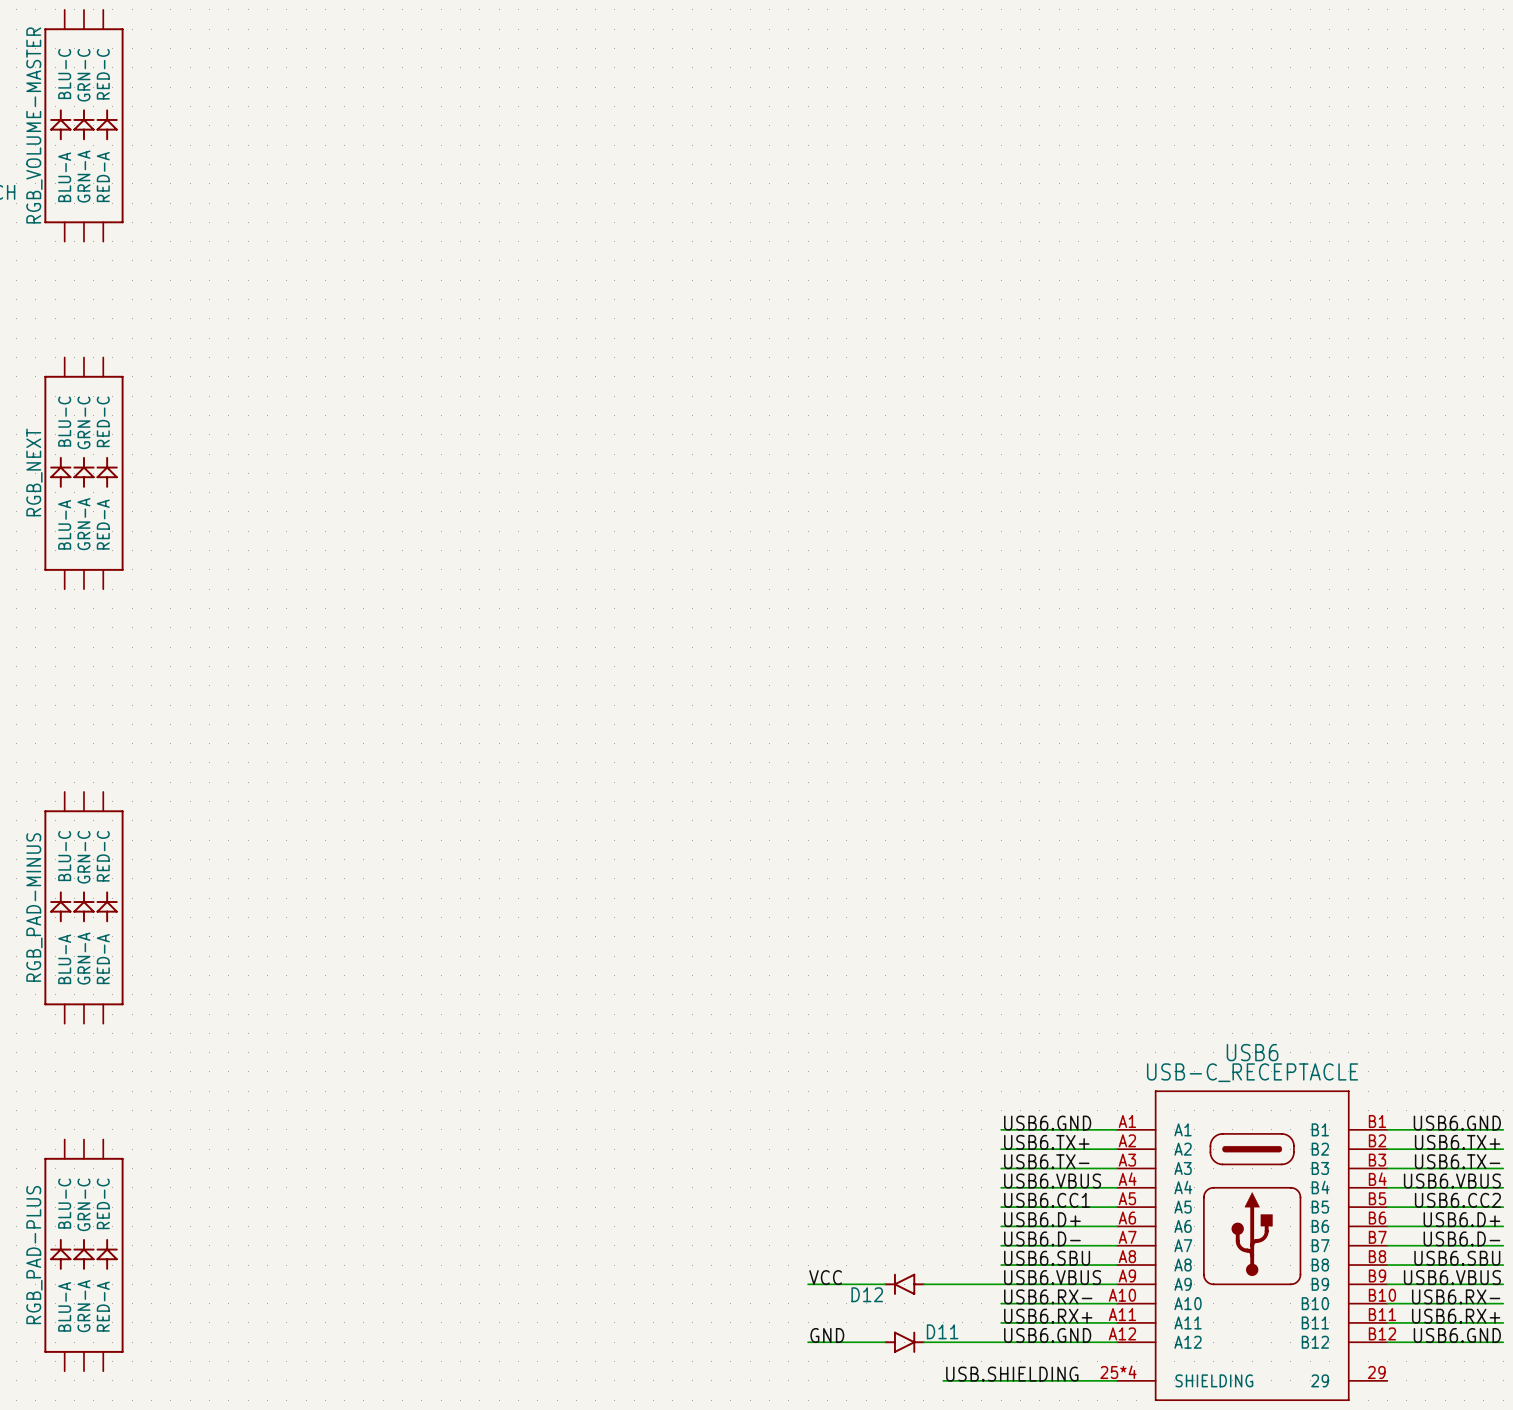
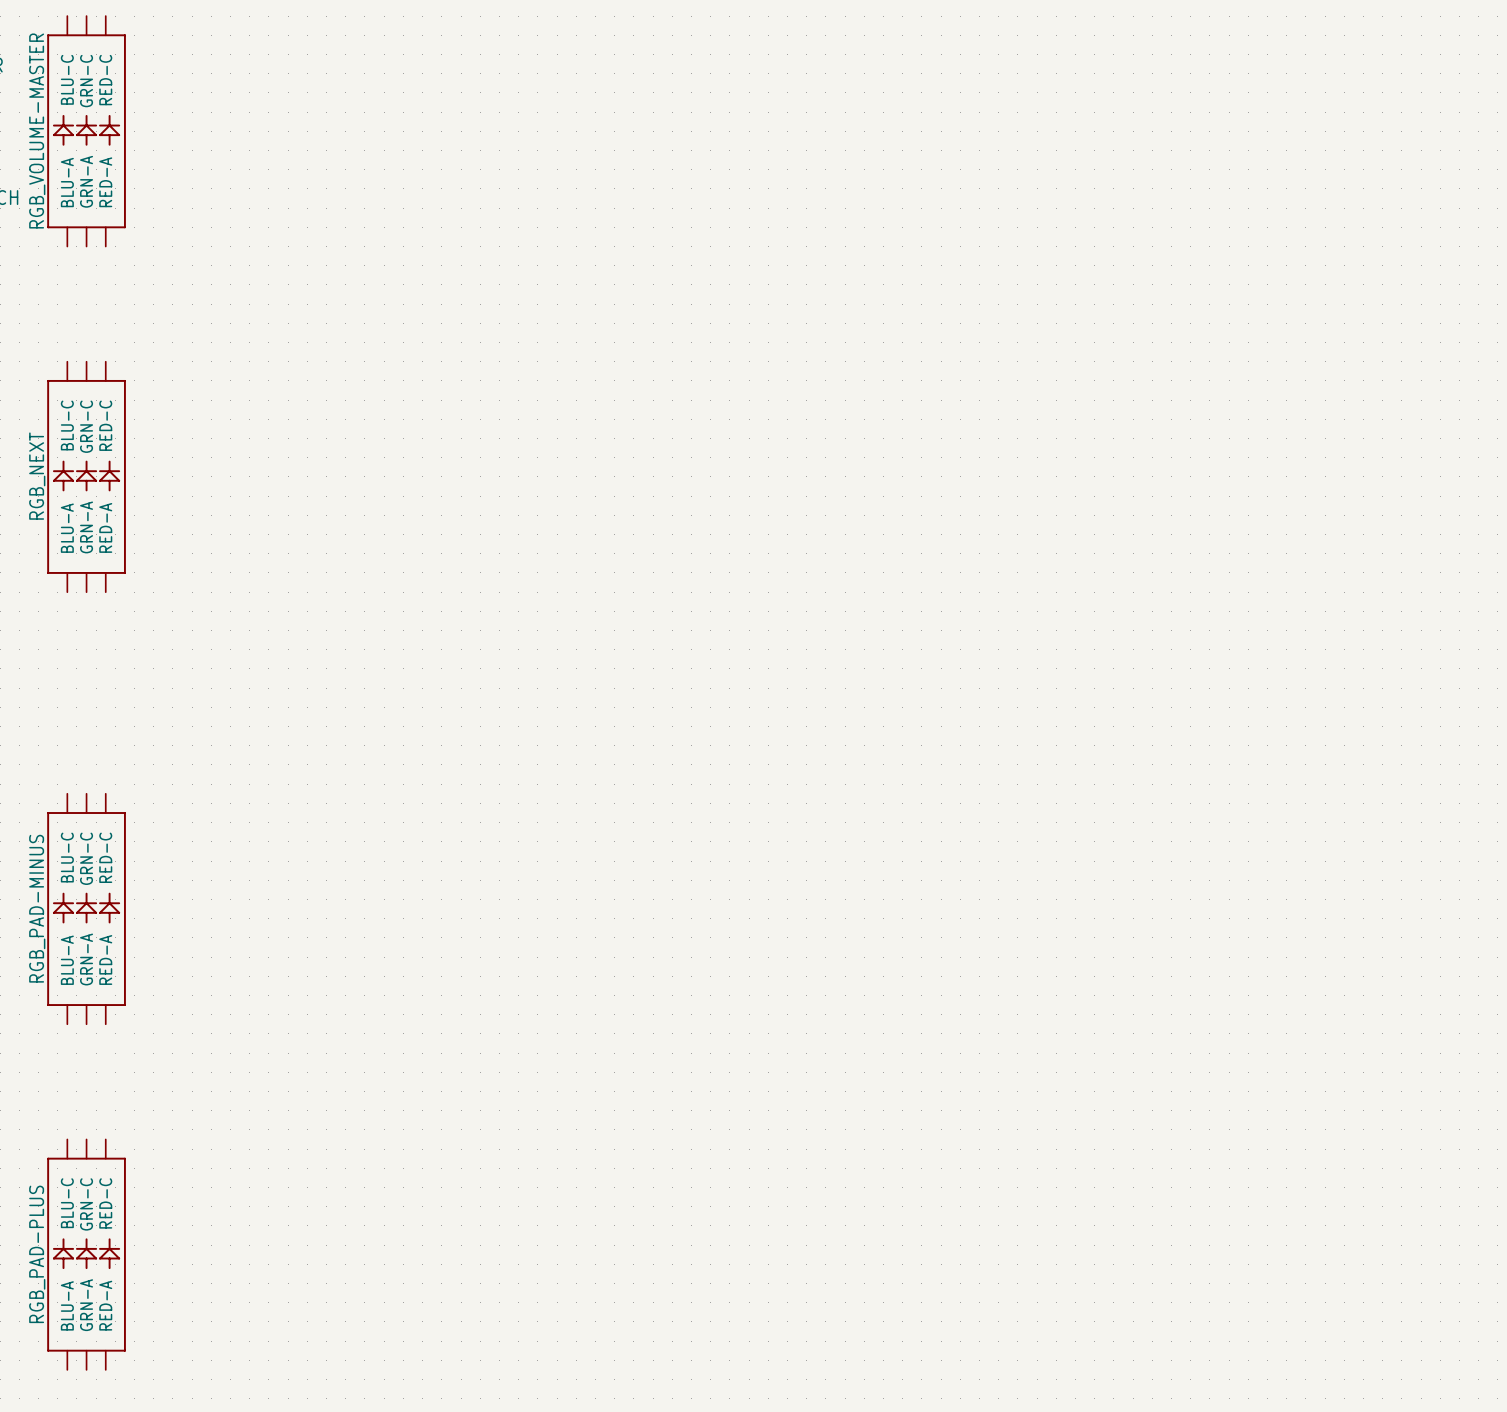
label: USB6.GND (1047, 1123) -> none
label: USB6.GND (1457, 1123) -> none
wire: (1001, 1129) (1117, 1129) -> none
wire: (1387, 1129) (1503, 1129) -> none
label: USB6.TX+ (1046, 1142) -> none
label: USB6.TX+ (1457, 1142) -> none
wire: (1001, 1149) (1117, 1149) -> none
wire: (1387, 1149) (1503, 1149) -> none
label: USB6.TX- (1046, 1161) -> none
label: USB6.TX- (1457, 1161) -> none
wire: (1001, 1168) (1117, 1168) -> none
wire: (1387, 1168) (1503, 1168) -> none
label: USB6.VBUS (1052, 1181) -> none
label: USB6.VBUS (1452, 1181) -> none
wire: (1001, 1187) (1117, 1187) -> none
wire: (1387, 1187) (1503, 1187) -> none
label: USB6.CC1 (1047, 1200) -> none
label: USB6.CC2 (1457, 1200) -> none
wire: (1001, 1207) (1117, 1207) -> none
wire: (1387, 1207) (1503, 1207) -> none
label: USB6.D+ (1042, 1219) -> none
label: USB6.D+ (1461, 1219) -> none
wire: (1001, 1226) (1117, 1226) -> none
wire: (1387, 1226) (1503, 1226) -> none
label: USB6.D- (1042, 1238) -> none
label: USB6.D- (1461, 1238) -> none
wire: (1001, 1245) (1117, 1245) -> none
USB6: USB-C_RECEPTACLE (1252, 1245) -> none
wire: (1387, 1245) (1503, 1245) -> none
label: USB6.SBU (1047, 1258) -> none
label: USB6.SBU (1457, 1258) -> none
wire: (1001, 1265) (1117, 1265) -> none
wire: (1387, 1265) (1503, 1265) -> none
label: VCC (825, 1277) -> none
label: USB6.VBUS (1052, 1277) -> none
label: USB6.VBUS (1452, 1277) -> none
wire: (808, 1284) (885, 1284) -> none
D12: (904, 1284) -> none
wire: (923, 1284) (1117, 1284) -> none
wire: (1387, 1284) (1503, 1284) -> none
label: USB6.RX- (1048, 1296) -> none
label: USB6.RX- (1456, 1296) -> none
wire: (1001, 1303) (1117, 1303) -> none
wire: (1387, 1303) (1503, 1303) -> none
label: USB6.RX+ (1048, 1316) -> none
label: USB6.RX+ (1456, 1316) -> none
wire: (1001, 1322) (1117, 1322) -> none
wire: (1387, 1322) (1503, 1322) -> none
label: GND (827, 1335) -> none
label: USB6.GND (1047, 1335) -> none
label: USB6.GND (1457, 1335) -> none
wire: (808, 1342) (885, 1342) -> none
D11: (904, 1342) -> none
wire: (923, 1342) (1117, 1342) -> none
wire: (1387, 1342) (1503, 1342) -> none
label: USB.SHIELDING (1012, 1374) -> none
wire: (943, 1380) (1117, 1380) -> none

